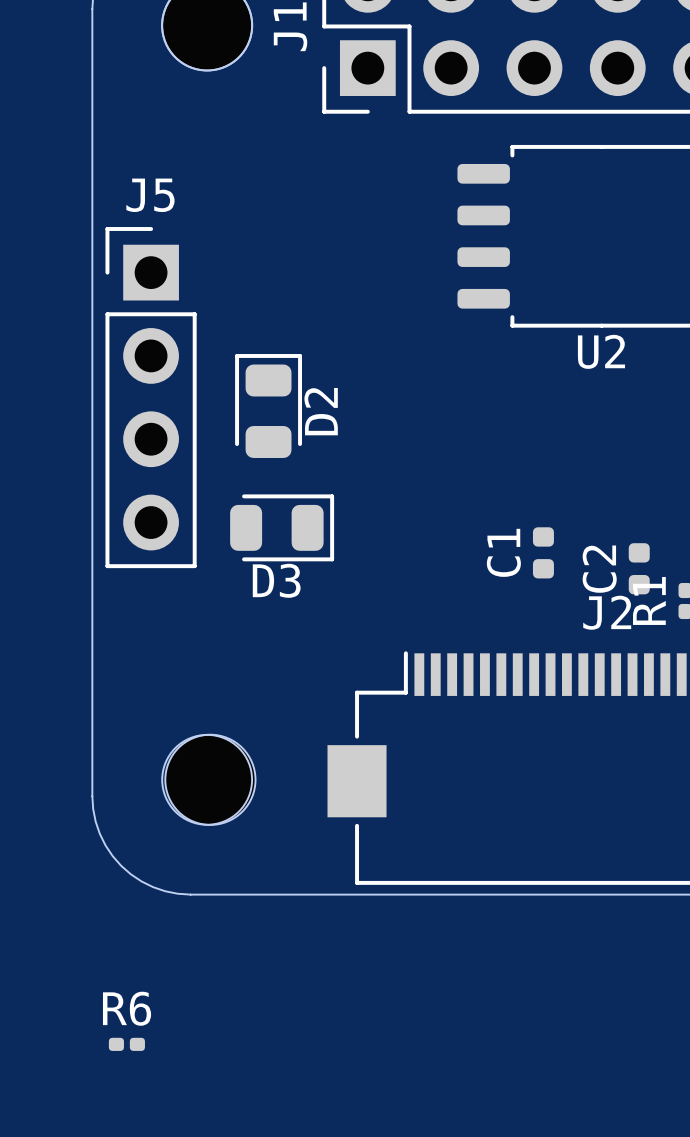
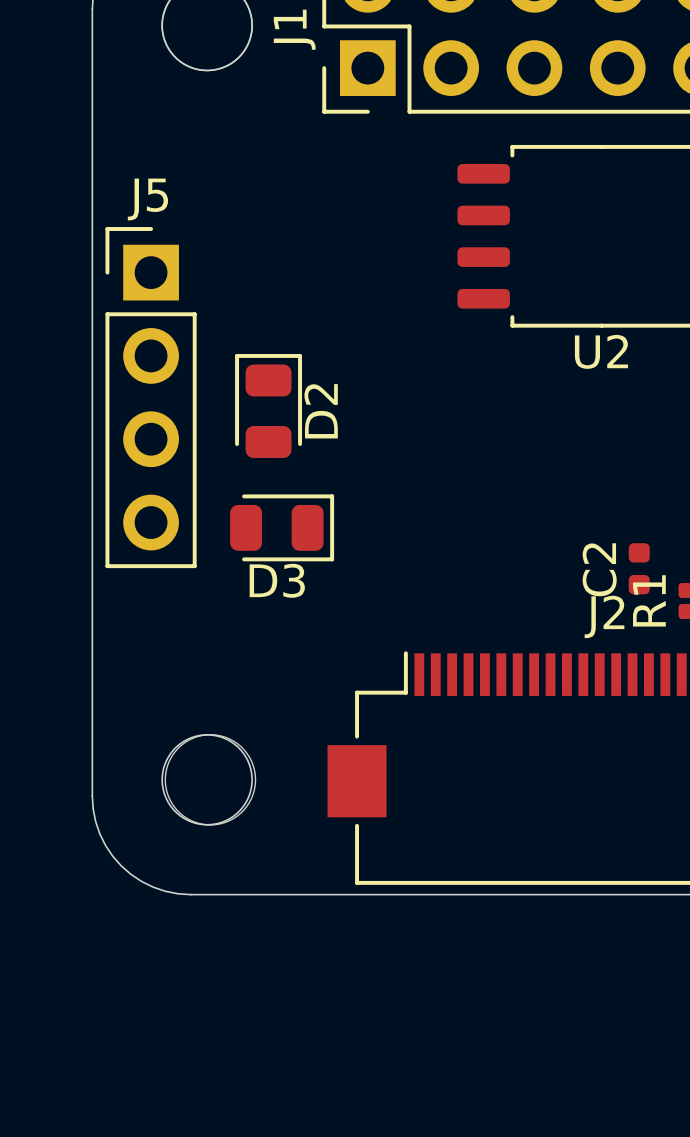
C1: (543, 552) -> none
R6: (126, 1044) -> none

